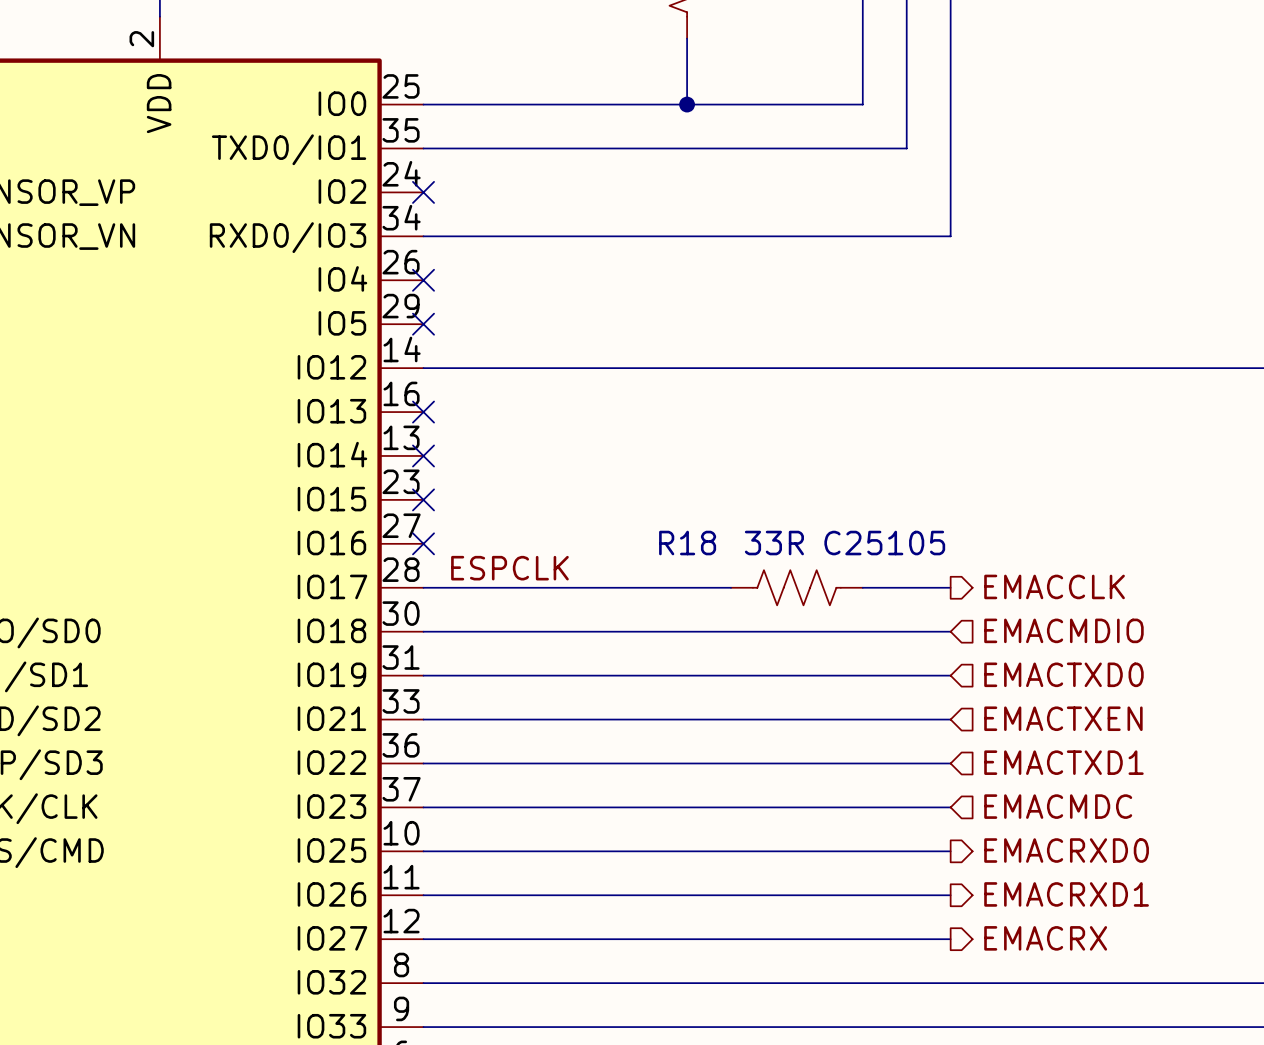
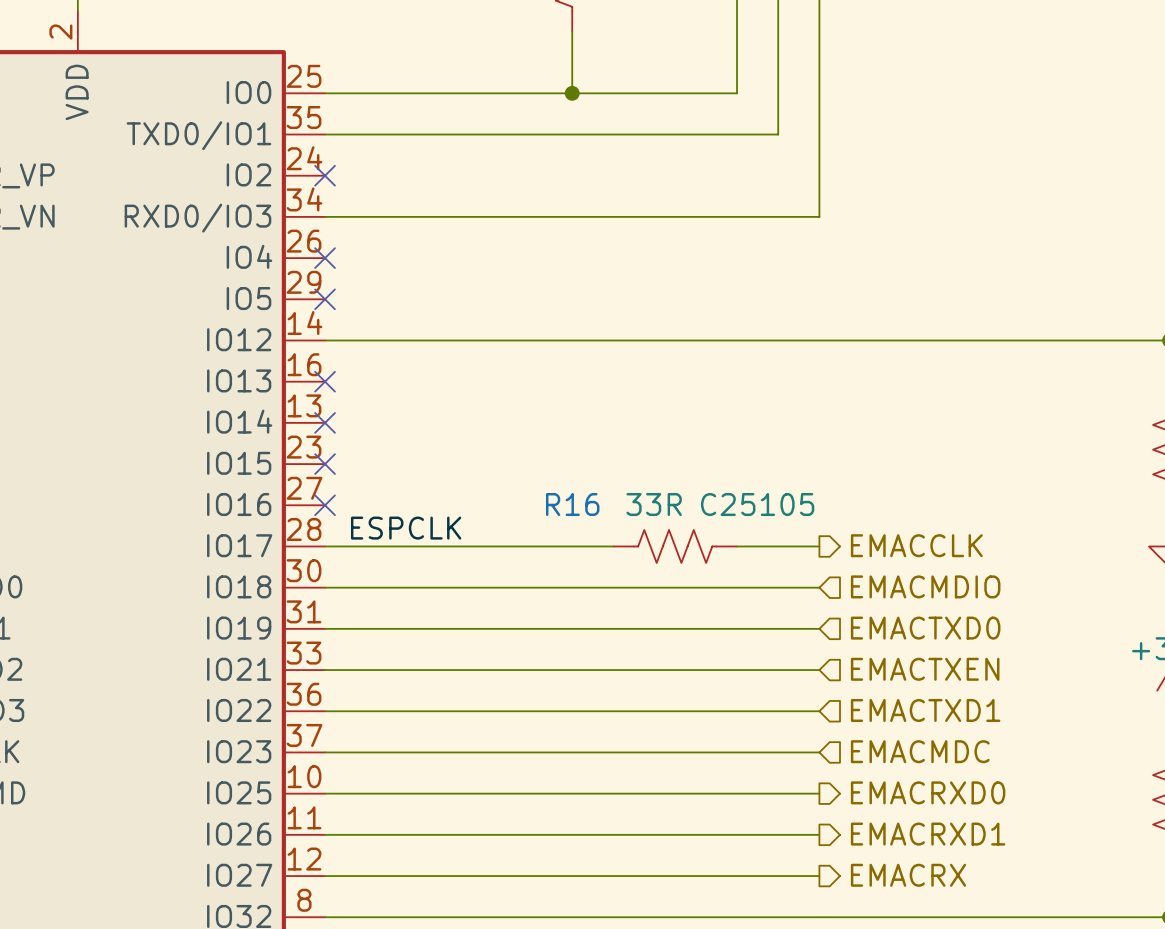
R18 name: R18 (687, 543) -> R16 (572, 504)

